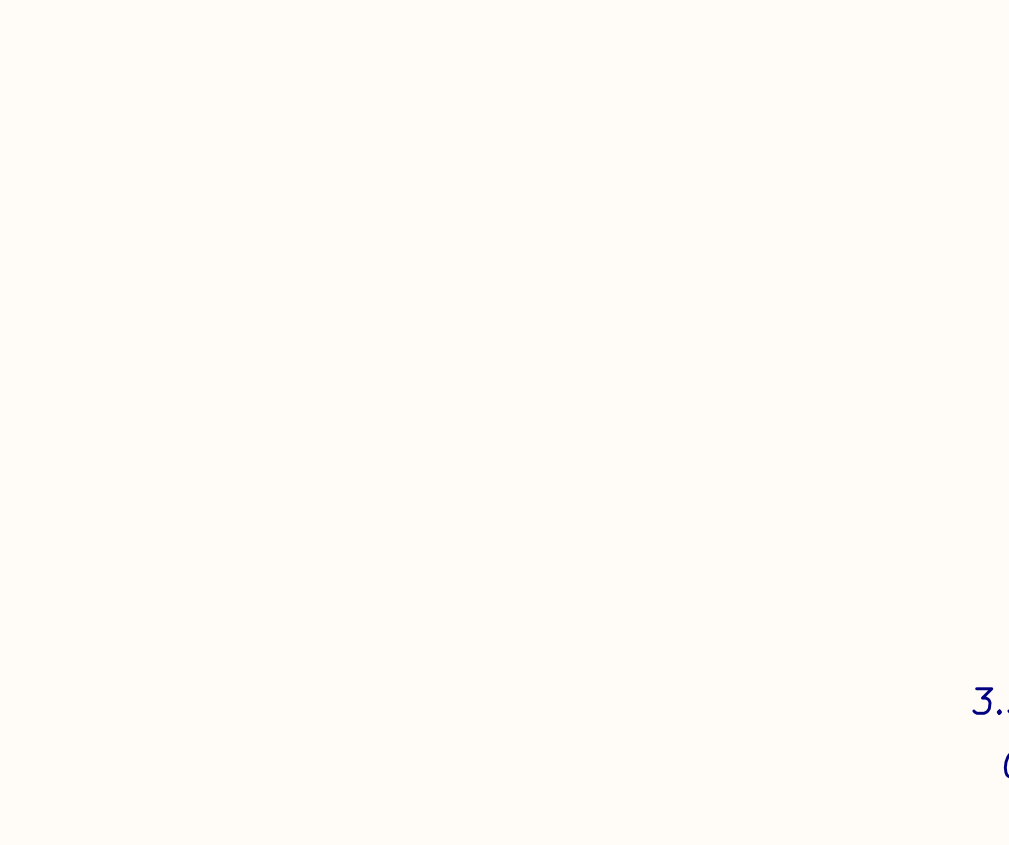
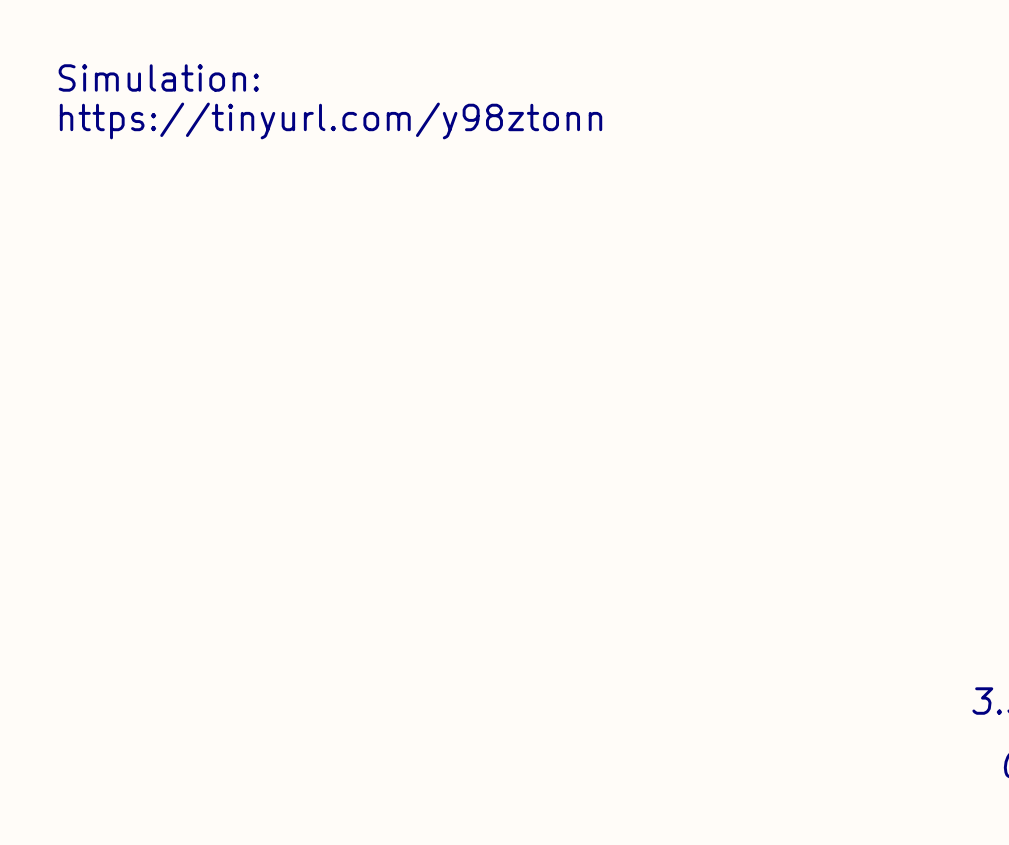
text: none -> Simulation: (158, 77)
text: none -> https://tinyurl.com/y98ztonn (331, 120)

